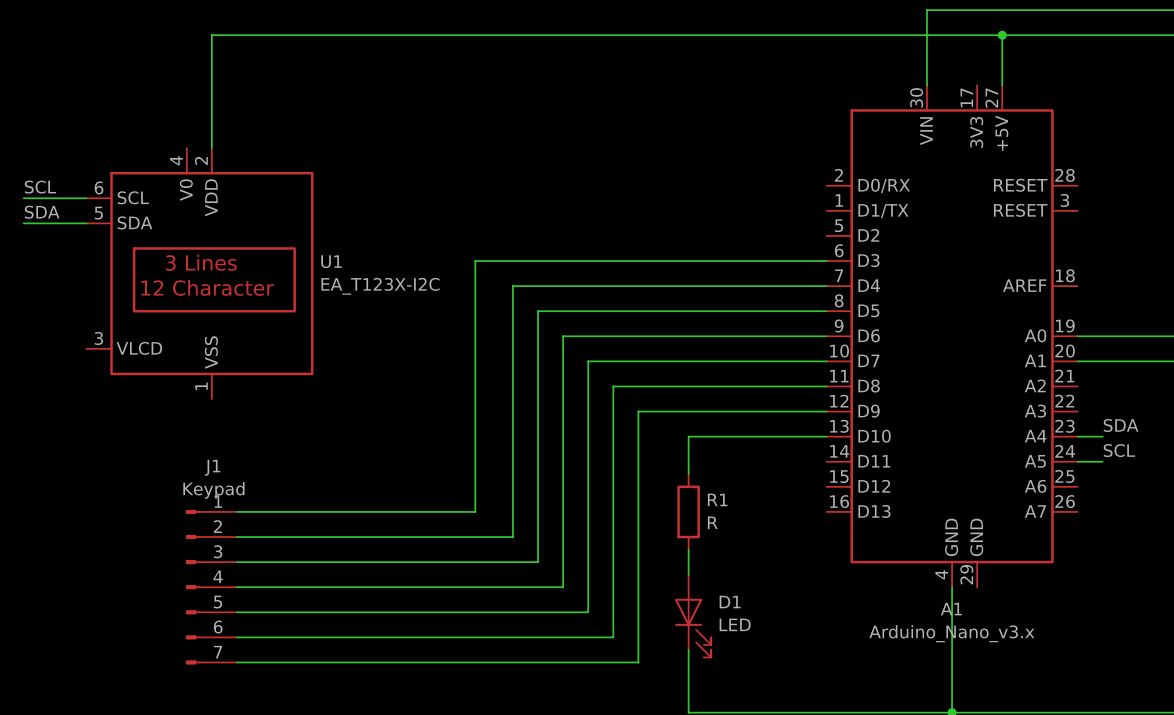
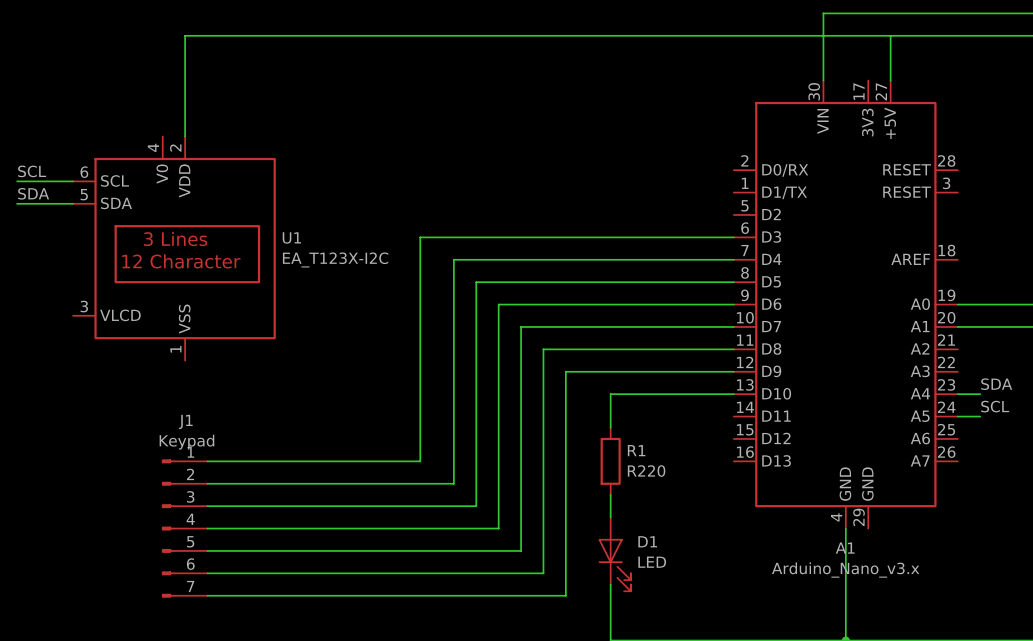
junction: (1002, 35) -> none
R1 value: R (712, 522) -> R220 (646, 471)

